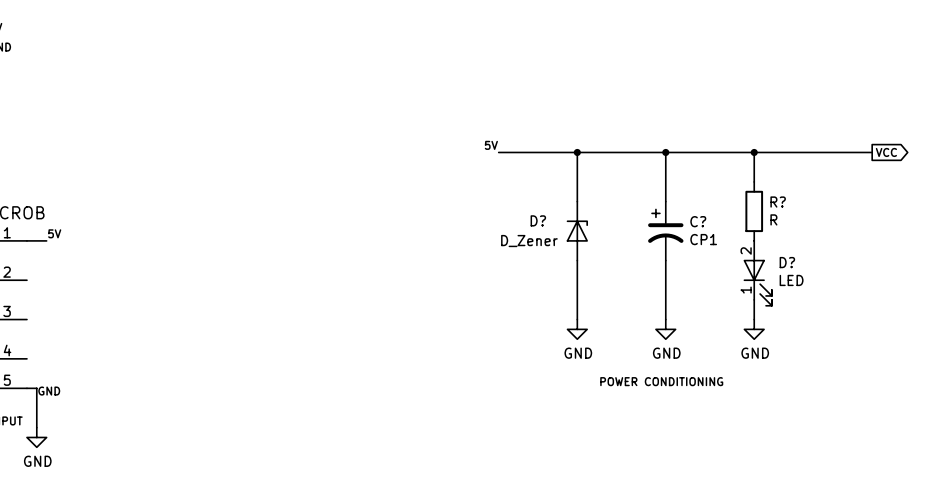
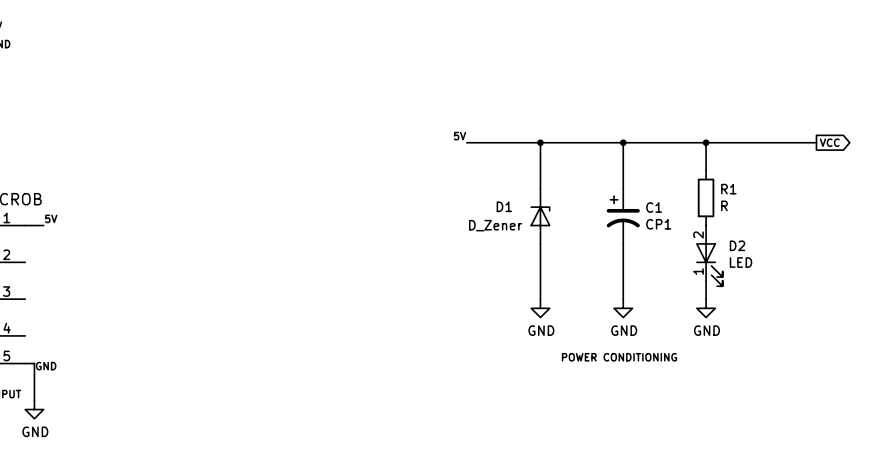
R? name: R? (778, 202) -> R1 (728, 189)
D? name: D? (538, 220) -> D1 (504, 206)
C? name: C? (698, 221) -> C1 (654, 207)
D? name: D? (787, 262) -> D2 (737, 245)

